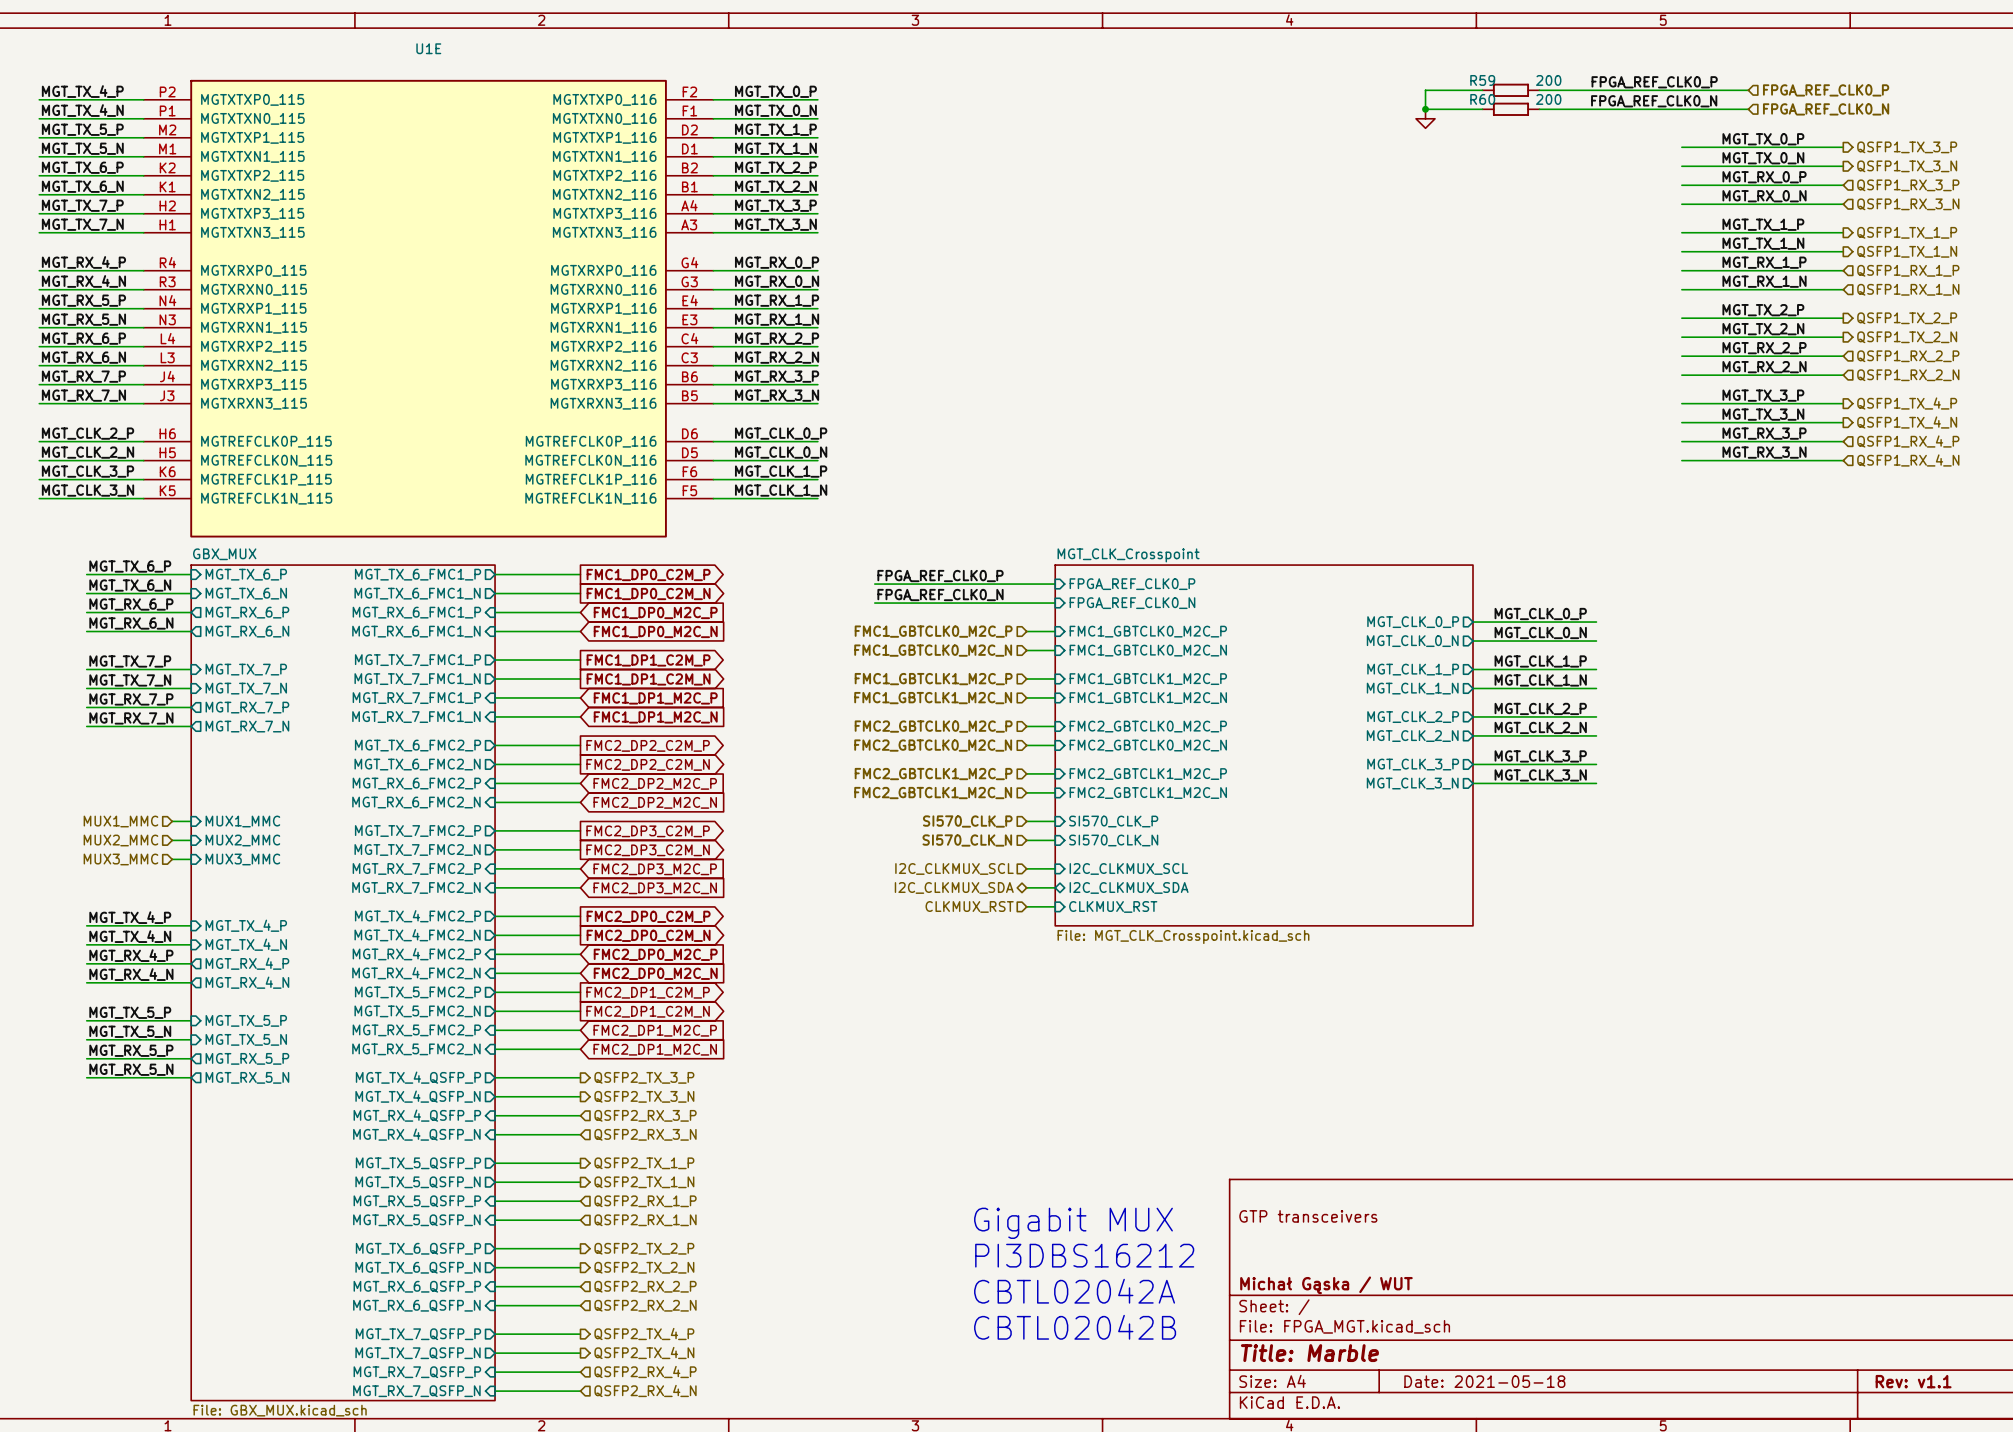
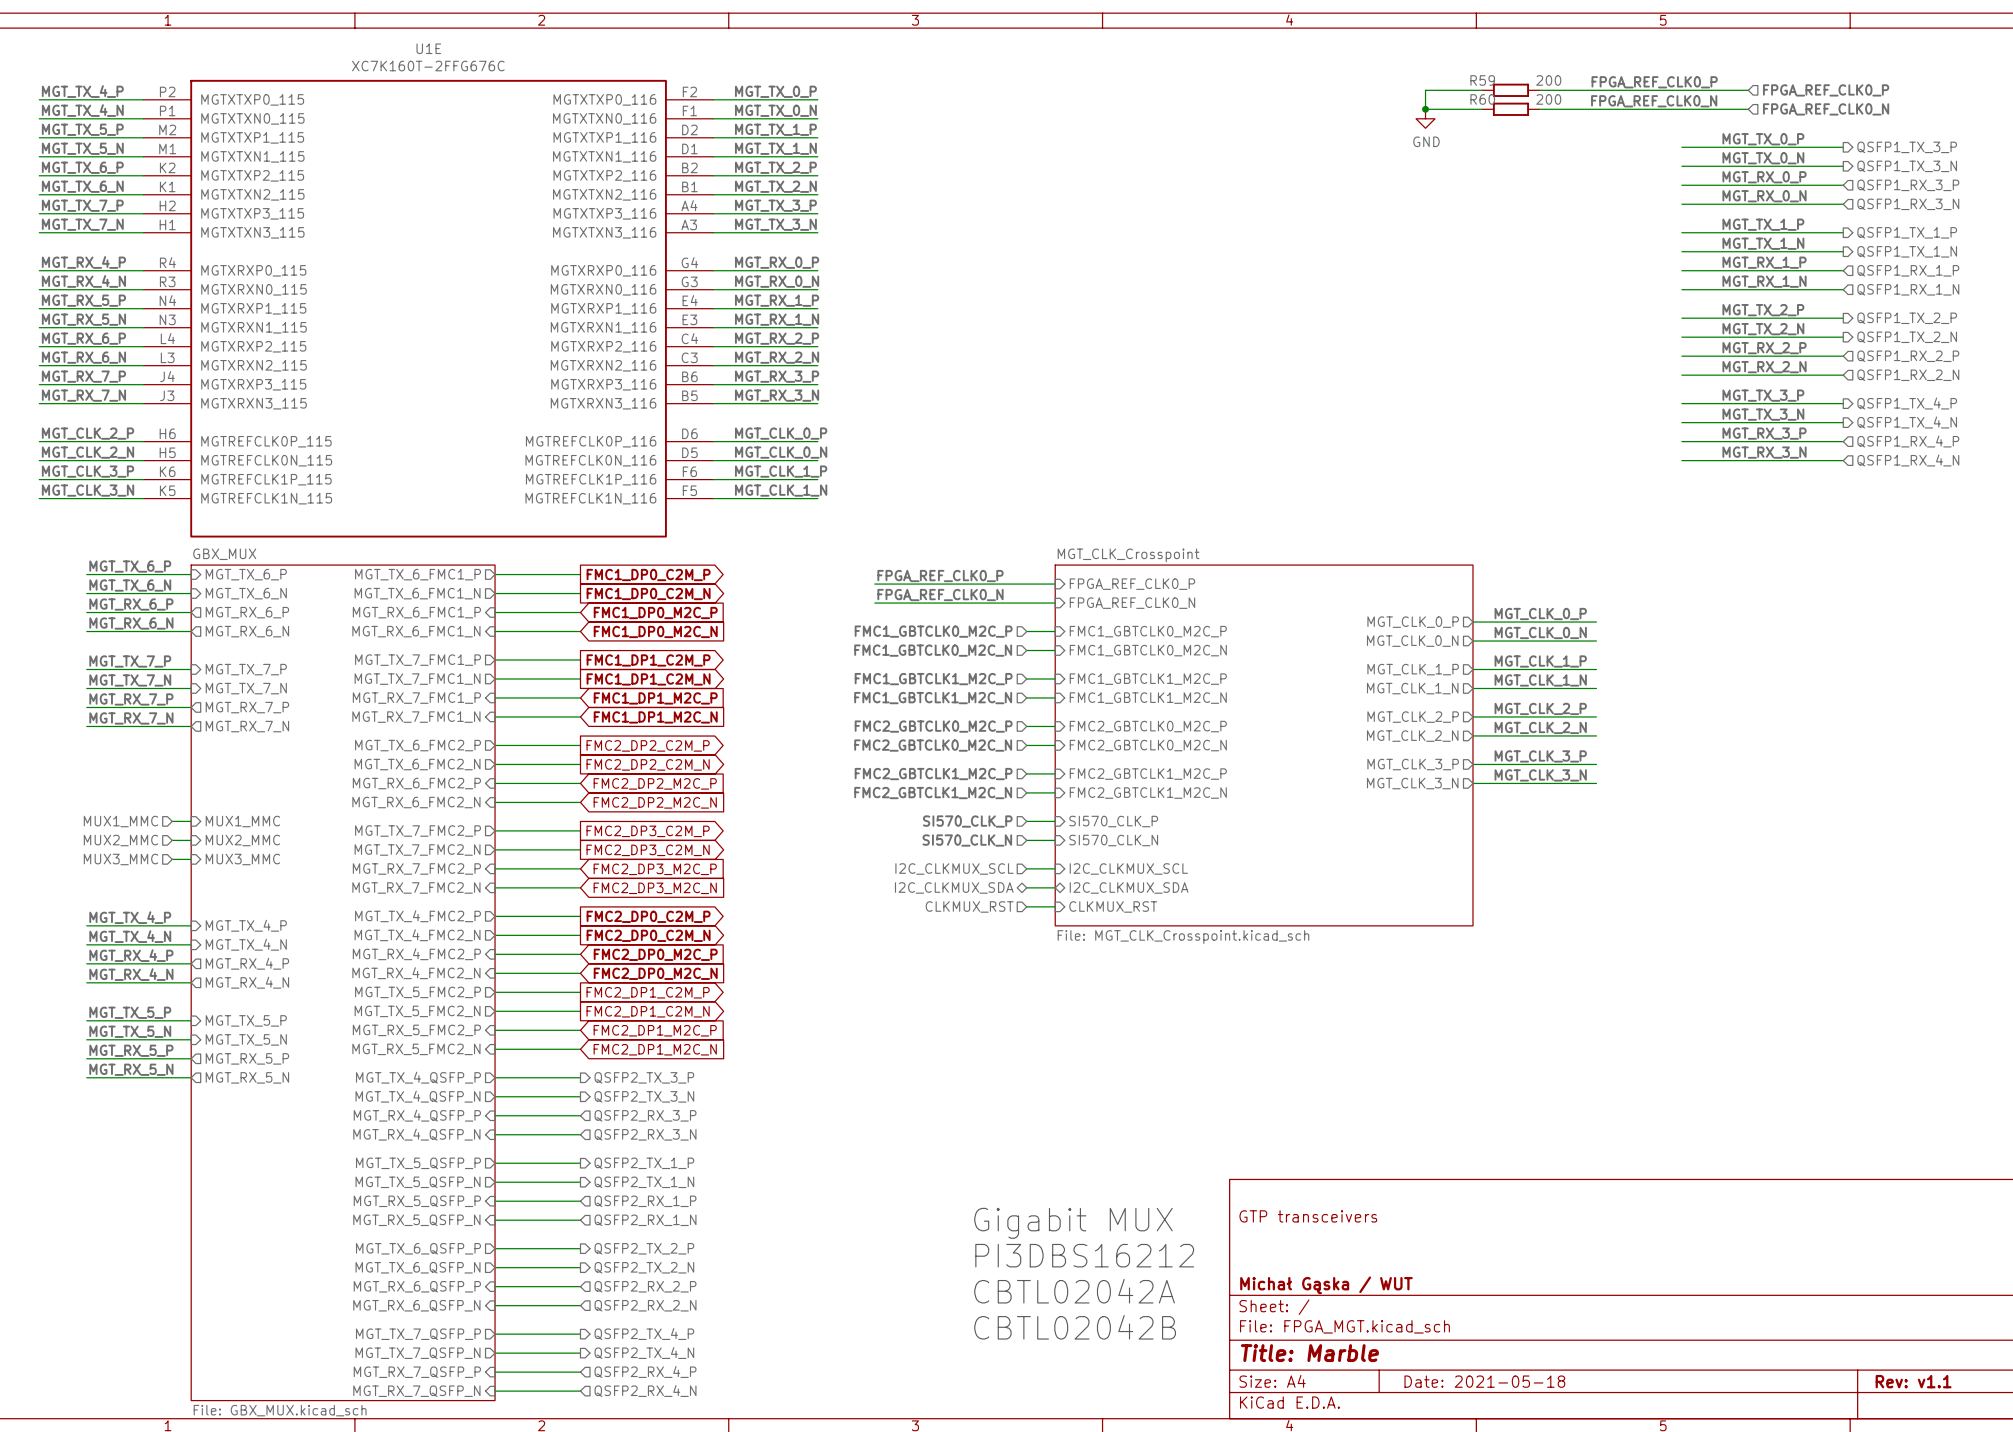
U1E value: none -> XC7K160T-2FFG676C (428, 66)
power symbol text: none -> GND (1426, 141)

